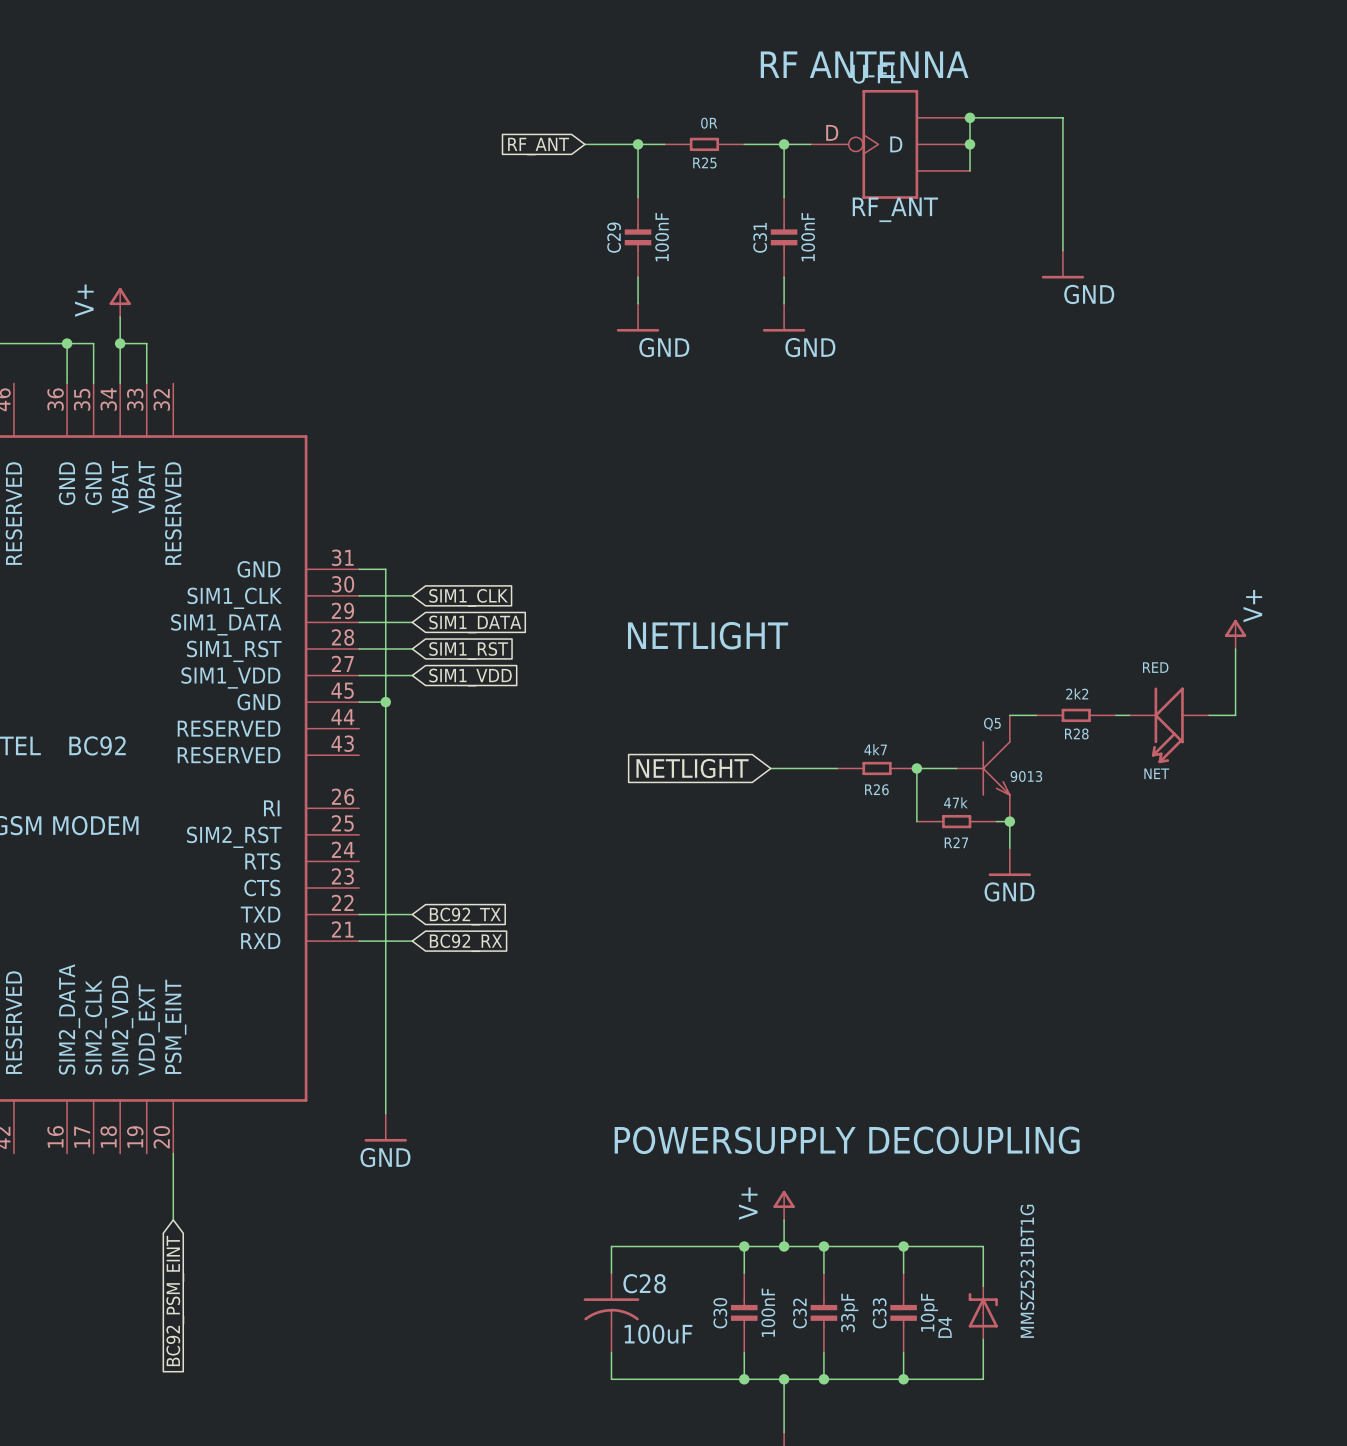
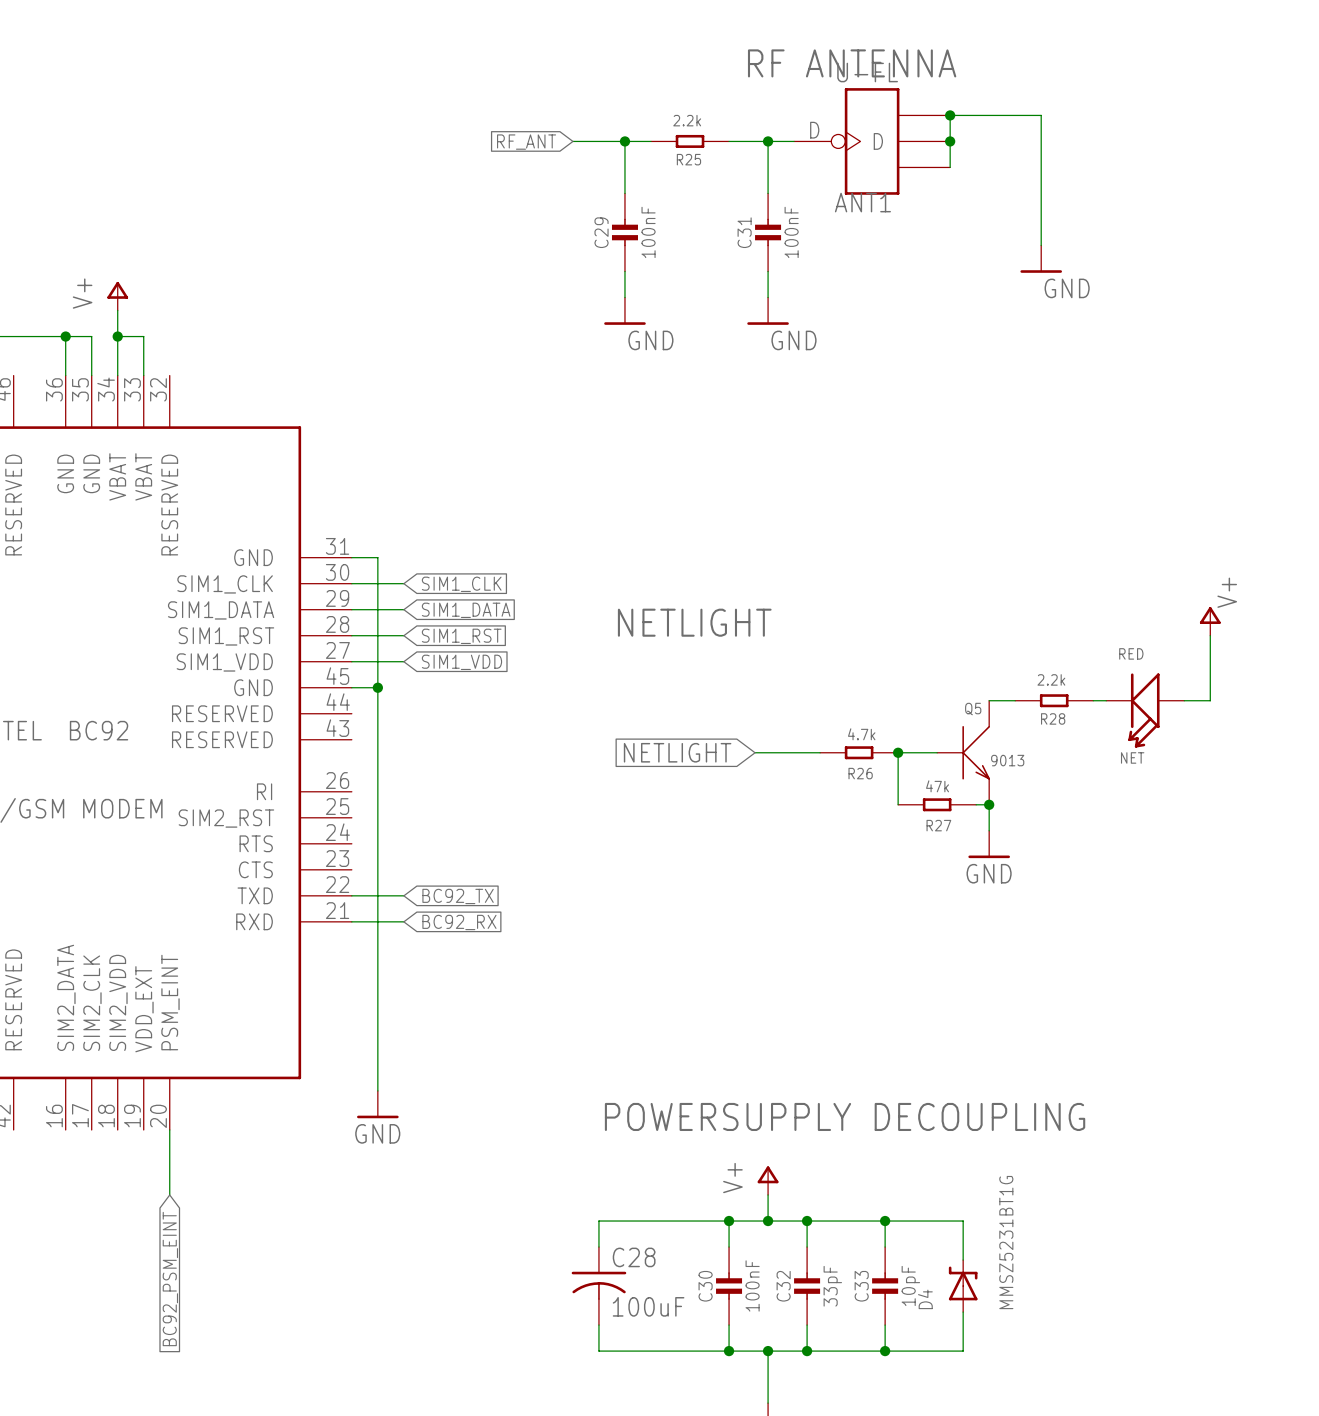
R25 value: 0R (709, 123) -> 2.2k (687, 120)
RF_ANT name: RF_ANT (895, 209) -> ANT1 (862, 202)
R28 value: 2k2 (1077, 693) -> 2.2k (1051, 679)
R26 value: 4k7 (875, 749) -> 4.7k (861, 734)

